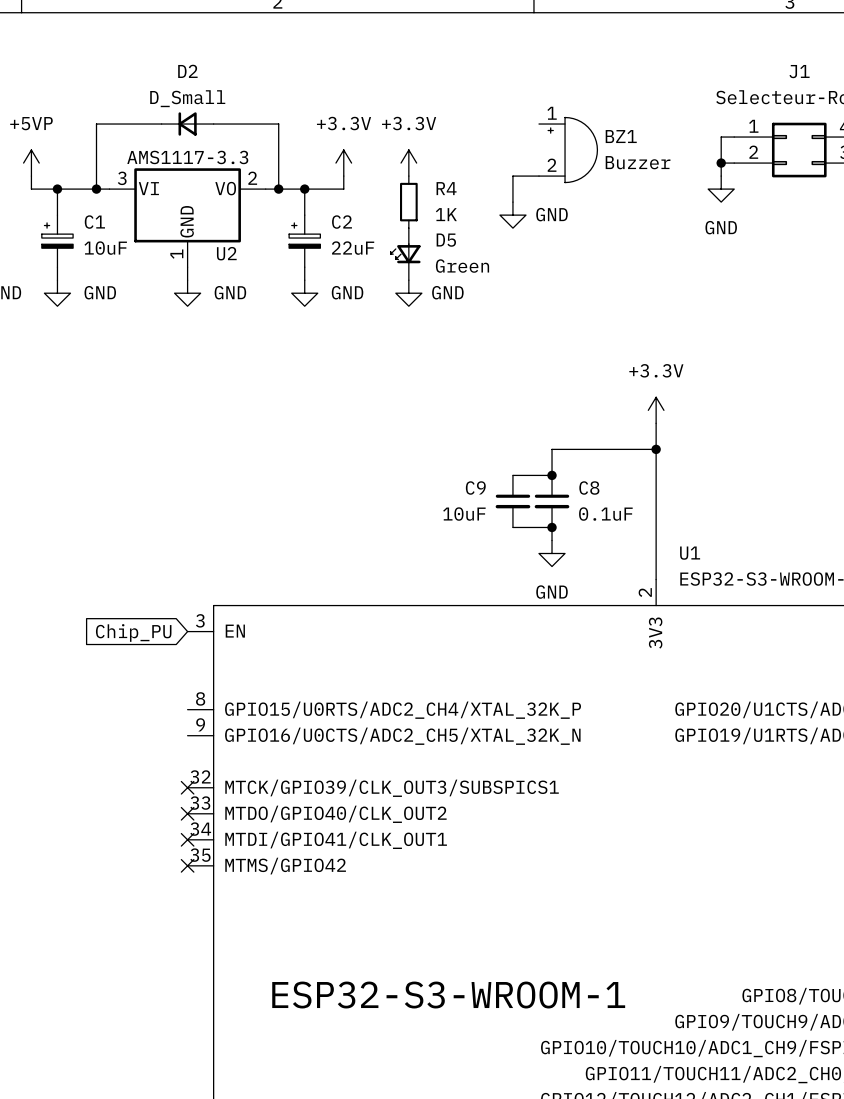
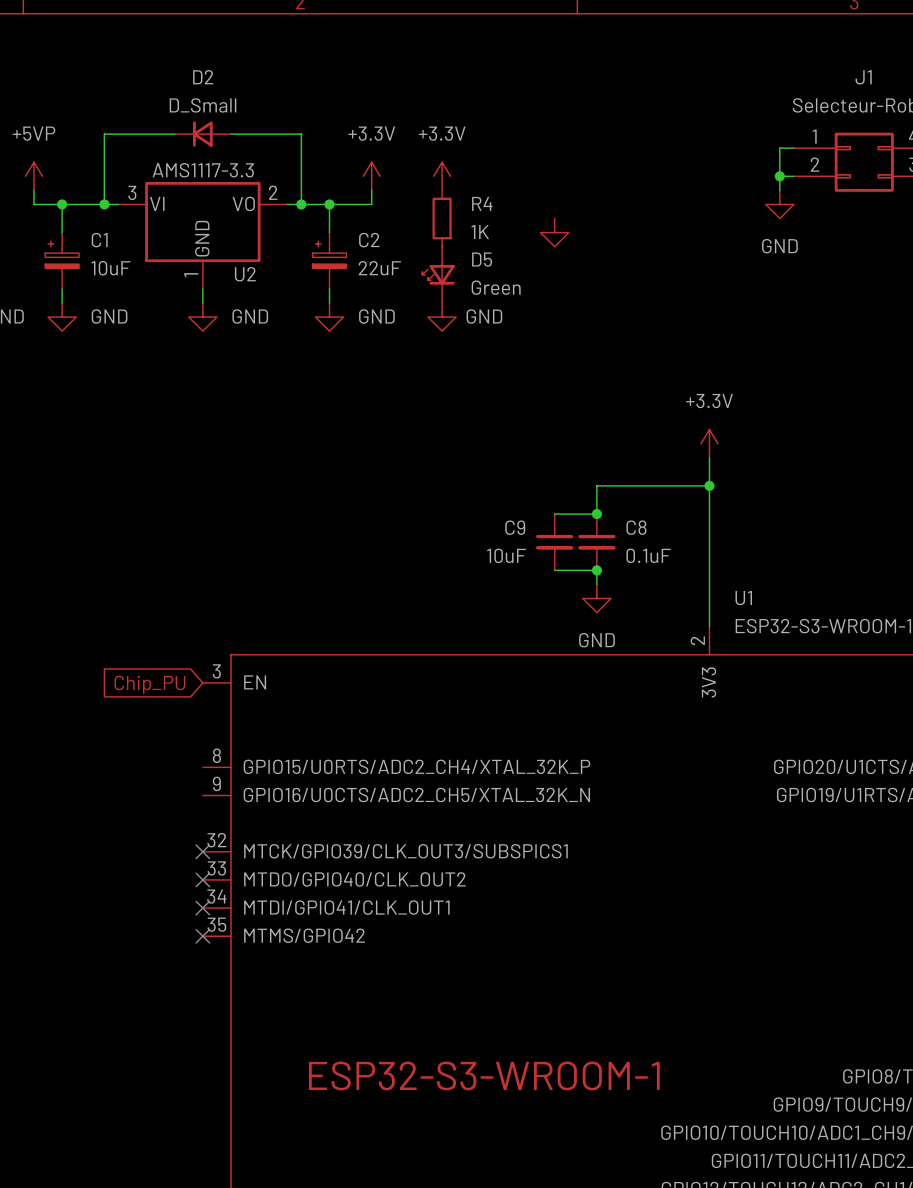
BZ1: Buzzer (568, 150) -> none
wire: (538, 176) (512, 176) (512, 202) -> none
power symbol text: GND (552, 214) -> none

